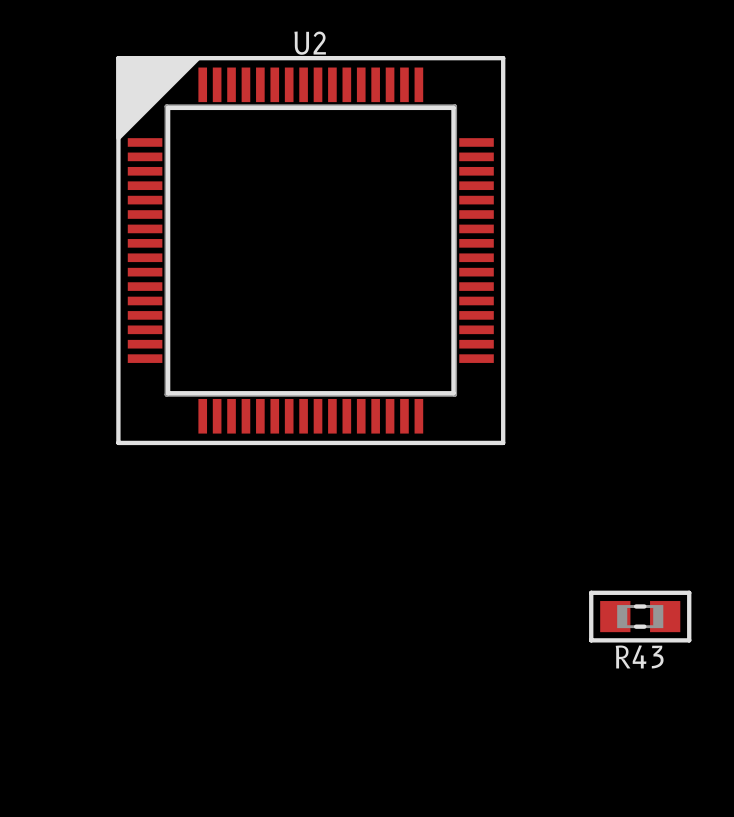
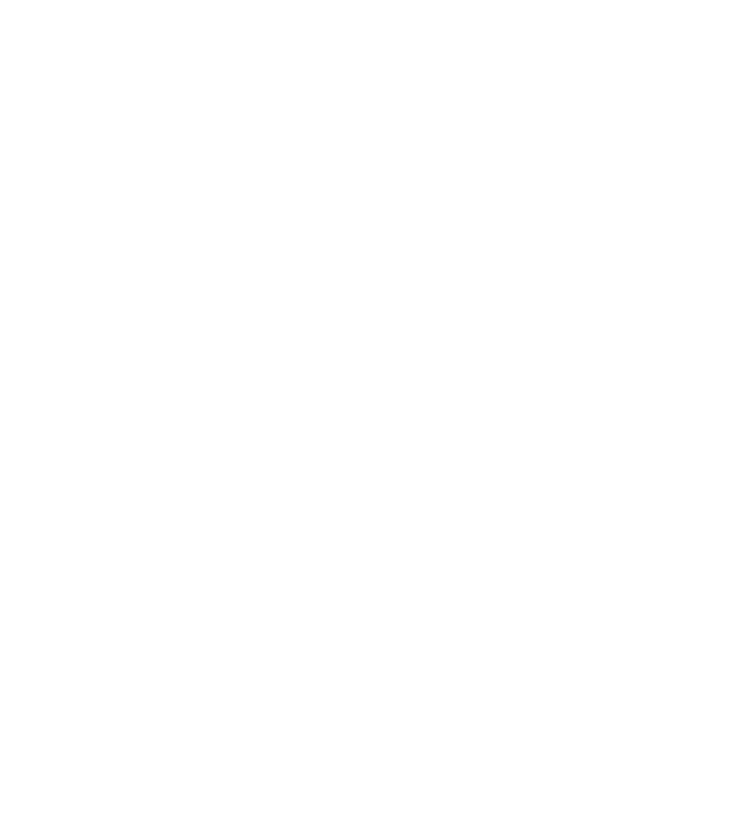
U2: (310, 250) -> none
R43: (640, 616) -> none

